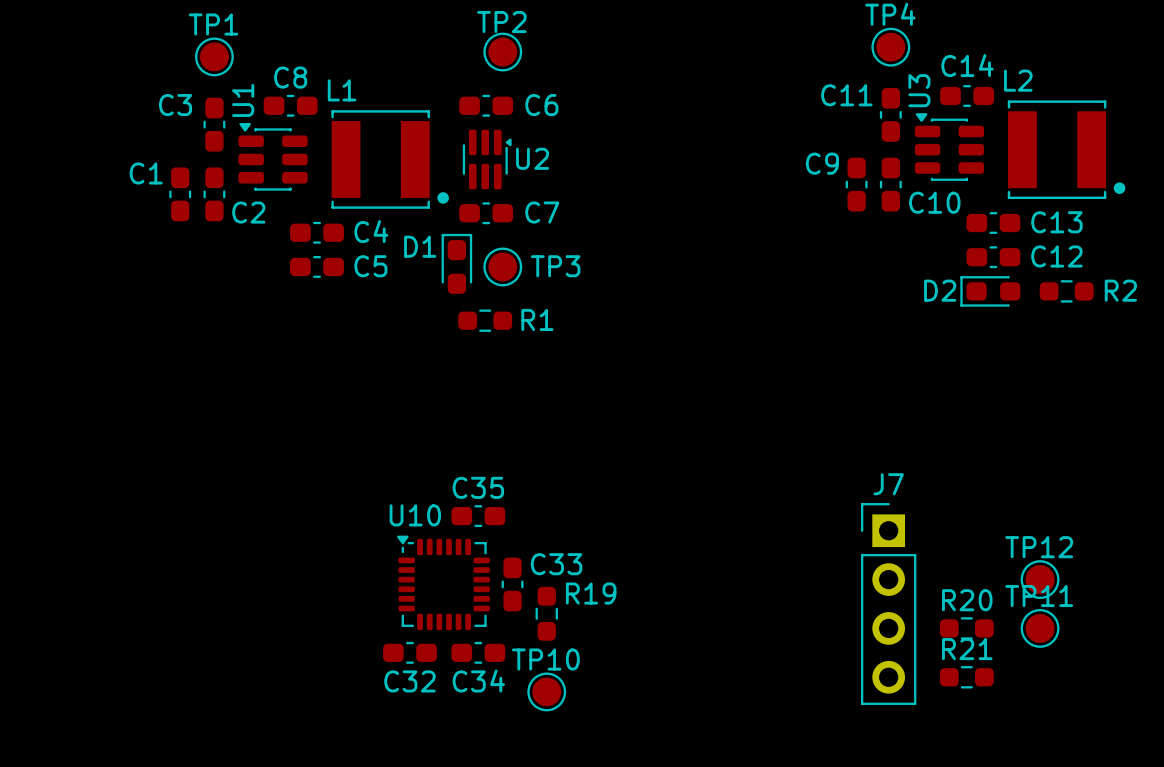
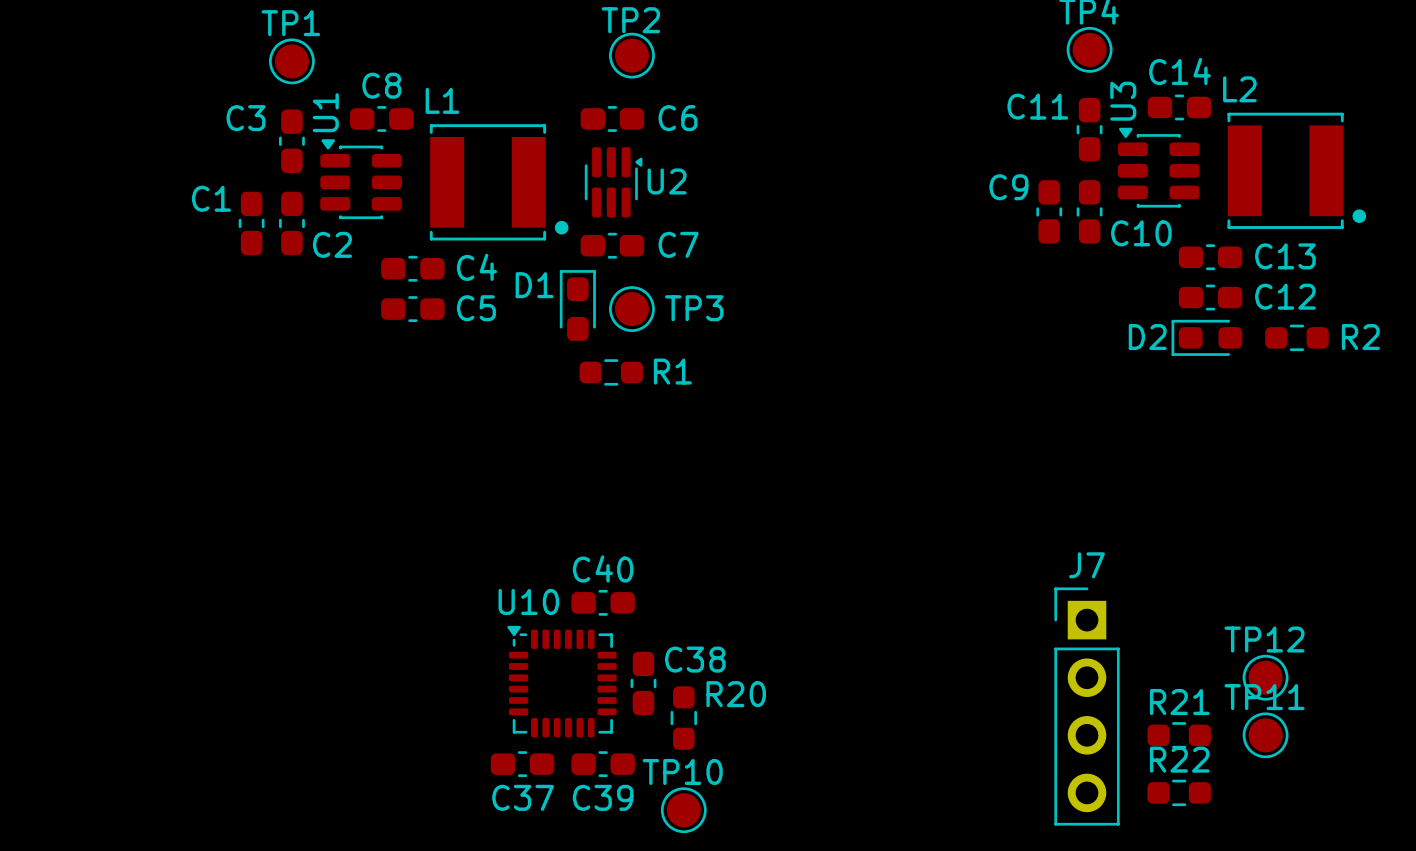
C35 name: C35 (478, 487) -> C40 (603, 569)
C33 name: C33 (556, 564) -> C38 (695, 659)
R19 name: R19 (591, 593) -> R20 (736, 694)
R20 name: R20 (967, 600) -> R21 (1179, 702)
R21 name: R21 (967, 649) -> R22 (1179, 759)
C34 name: C34 (478, 680) -> C39 (603, 797)
C32 name: C32 (409, 681) -> C37 (523, 797)

